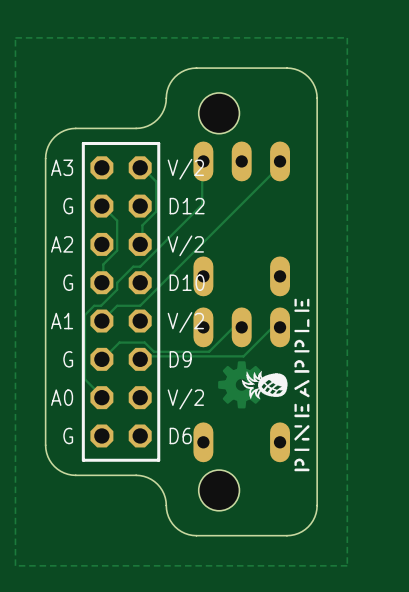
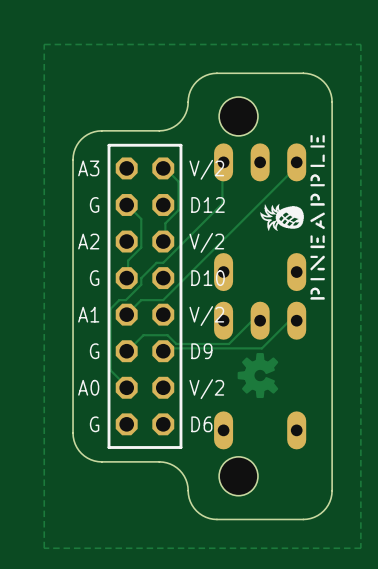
drawing position: (275, 385) -> (292, 217)

